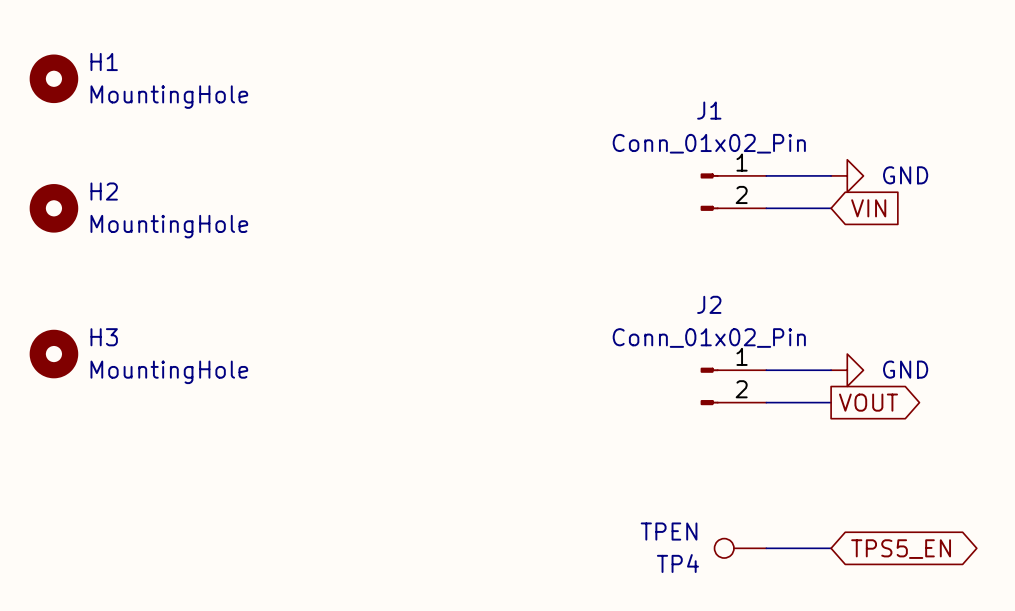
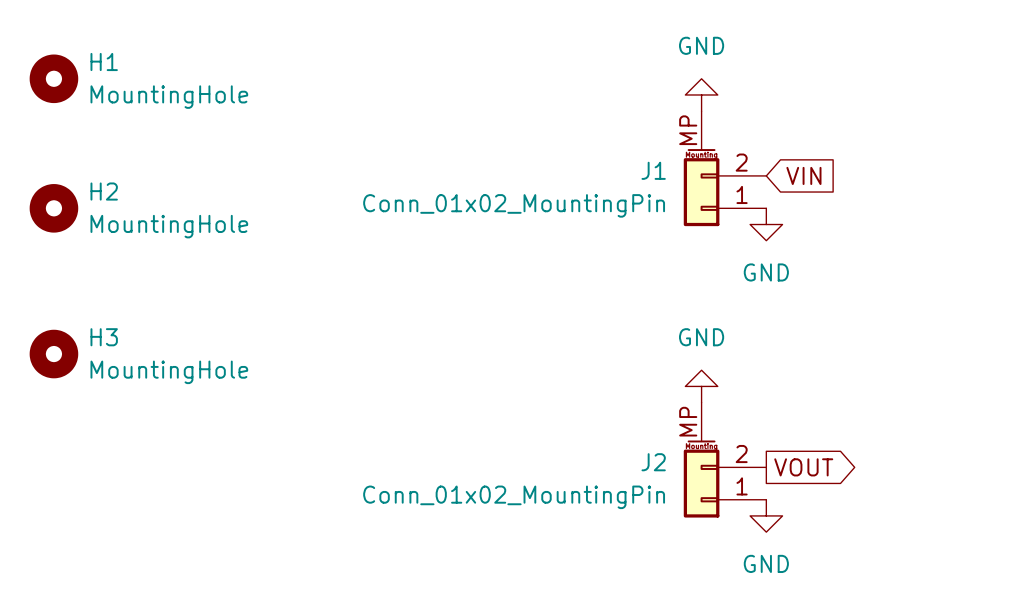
power symbol: none -> GND (701, 94)
J1 name position: J1 (709, 110) -> J1 (653, 170)
J1 value: Conn_01x02_Pin (709, 143) -> Conn_01x02_MountingPin (514, 205)
J1 symbol: [700, 173, 767, 211] -> [683, 111, 767, 227]
wire: (766, 175) (831, 175) -> none
power symbol: GND (847, 175) -> none
wire: (766, 208) (831, 208) -> none
global label position: VIN (868, 208) -> VIN (803, 175)
power symbol: none -> GND (766, 224)
J2 name position: J2 (709, 304) -> J2 (653, 462)
J2 value: Conn_01x02_Pin (709, 338) -> Conn_01x02_MountingPin (514, 497)
J2 symbol: [700, 367, 767, 406] -> [683, 402, 767, 518]
wire: (766, 370) (831, 370) -> none
power symbol: GND (847, 370) -> none
power symbol: none -> GND (701, 386)
wire: (766, 402) (831, 402) -> none
global label position: VOUT (868, 402) -> VOUT (803, 467)
power symbol: none -> GND (766, 515)
TP4: TPEN (740, 548) -> none
wire: (766, 548) (831, 548) -> none
global label: TPS5_EN (901, 549) -> none

